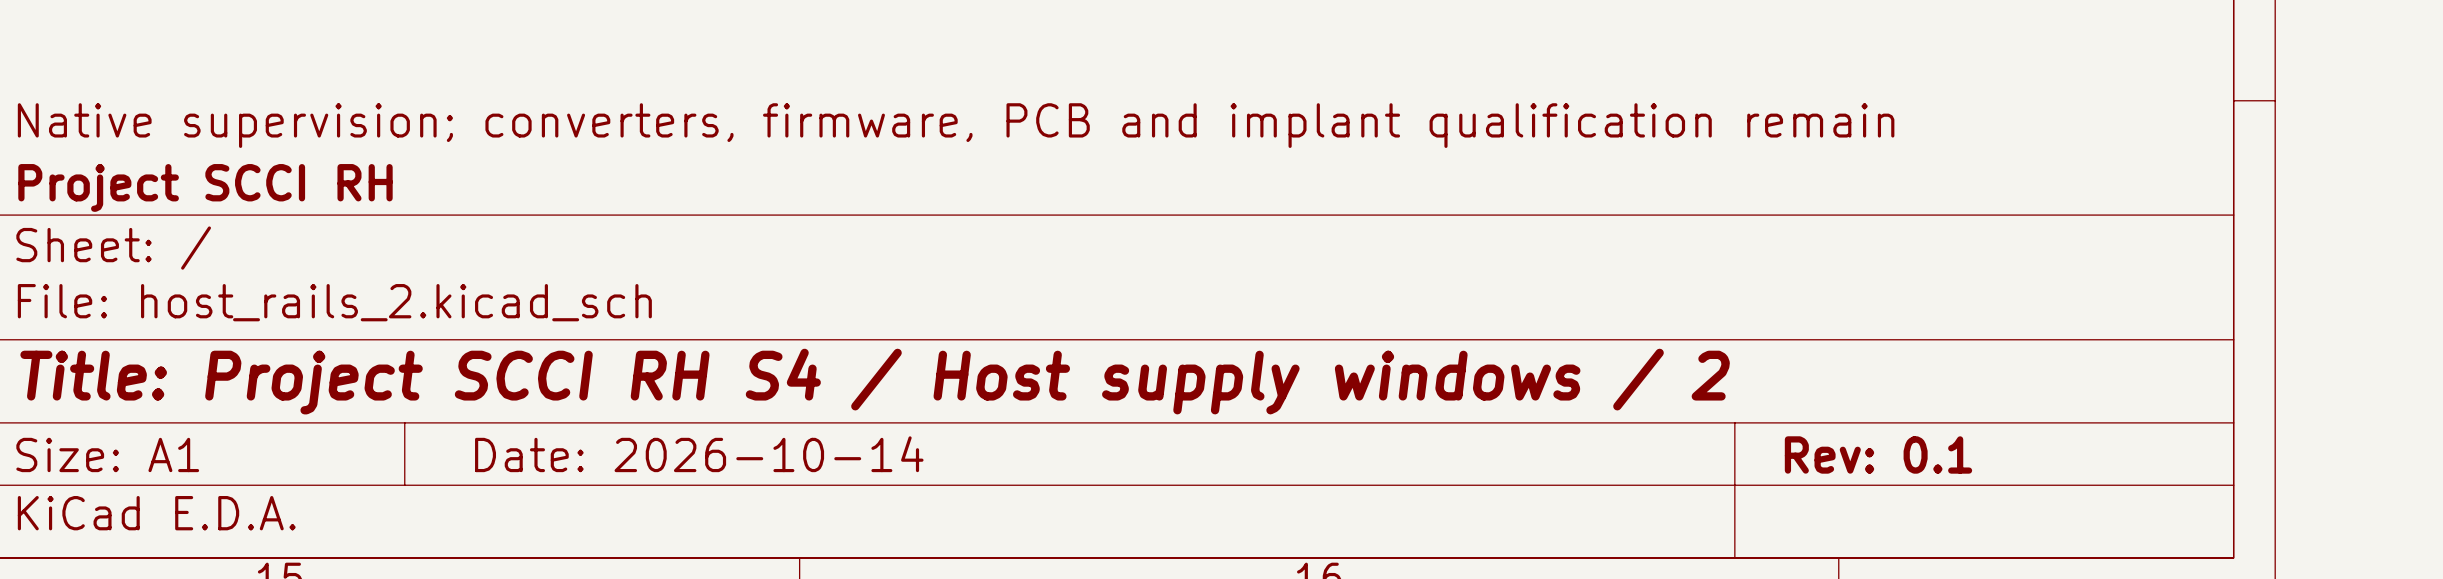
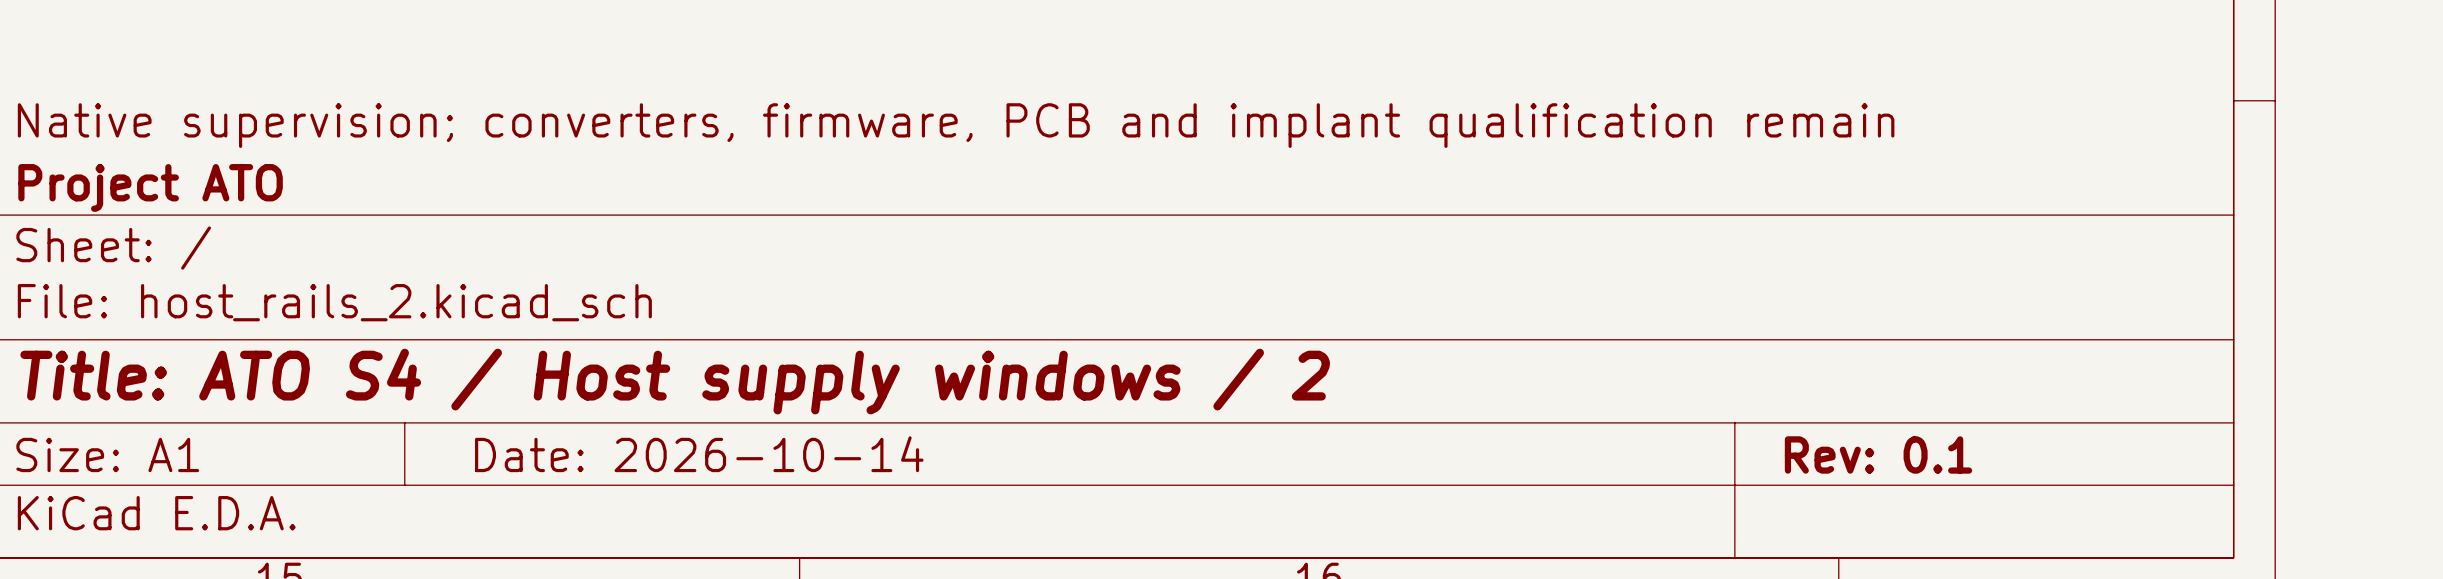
title block: Project SCCI RH (205, 187) -> Project ATO (150, 187)
title block: Title: Project SCCI RH S4 / Host supply windows / 2 (875, 381) -> Title: ATO S4 / Host supply windows / 2 (675, 381)

